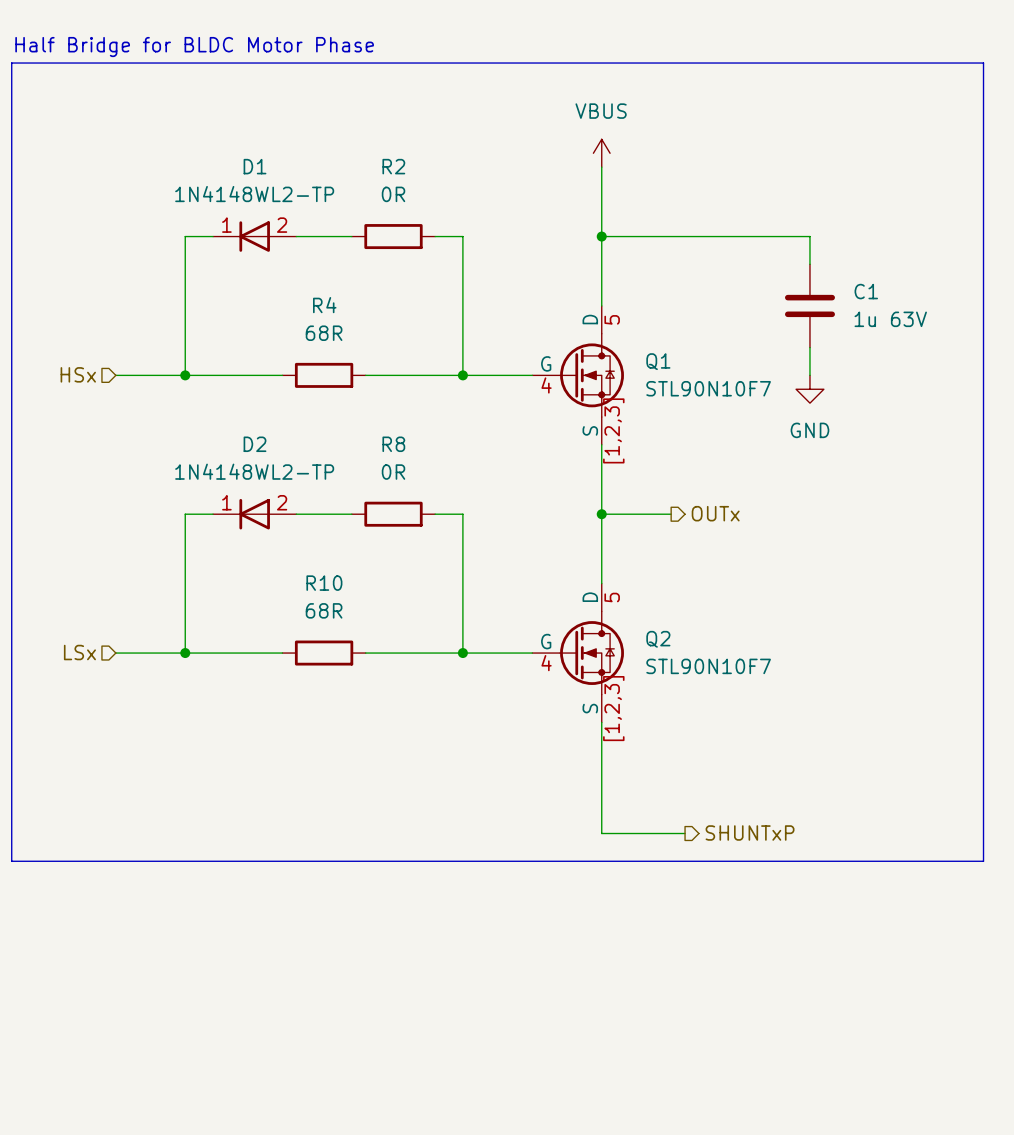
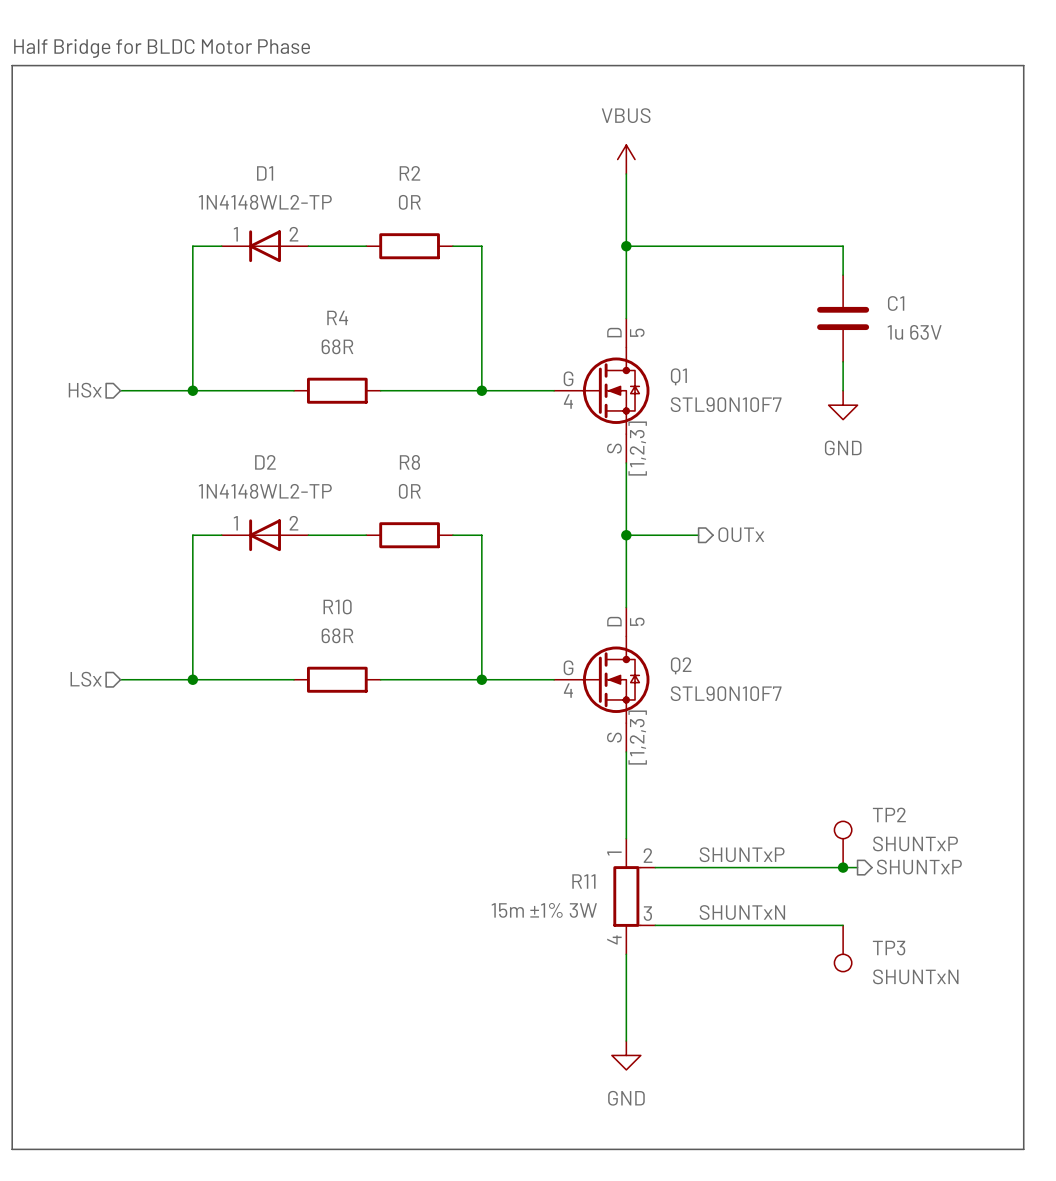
TP2: none -> SHUNTxP (843, 844)
label: none -> SHUNTxP (742, 854)
hierarchical label position: SHUNTxP (750, 832) -> SHUNTxP (919, 867)
wire: none -> (713, 867) (857, 867)
junction: none -> (843, 867)
line: (11, 861) (983, 861) -> (12, 896) (12, 1149) (1023, 1149) (1023, 896)
R11: none -> 15m ±1% 3W (634, 896)
label: none -> SHUNTxN (742, 912)
wire: none -> (655, 925) (843, 925)
TP3: none -> SHUNTxN (843, 948)
wire: none -> (626, 954) (626, 1041)
power symbol: none -> GND (626, 1055)

